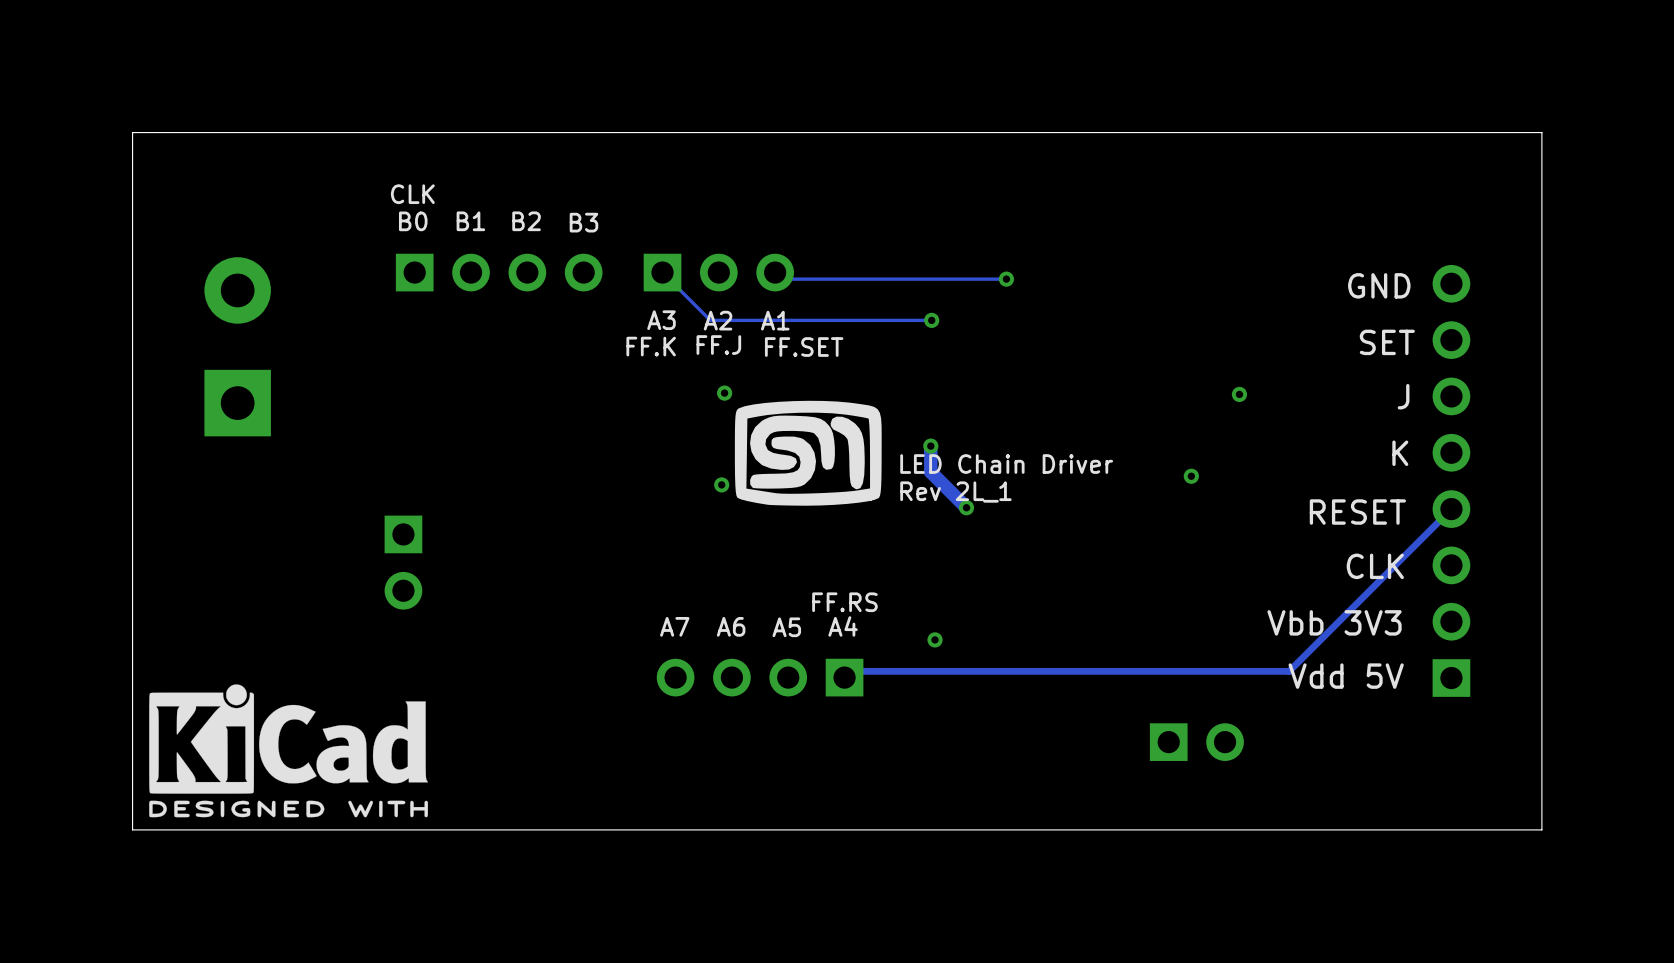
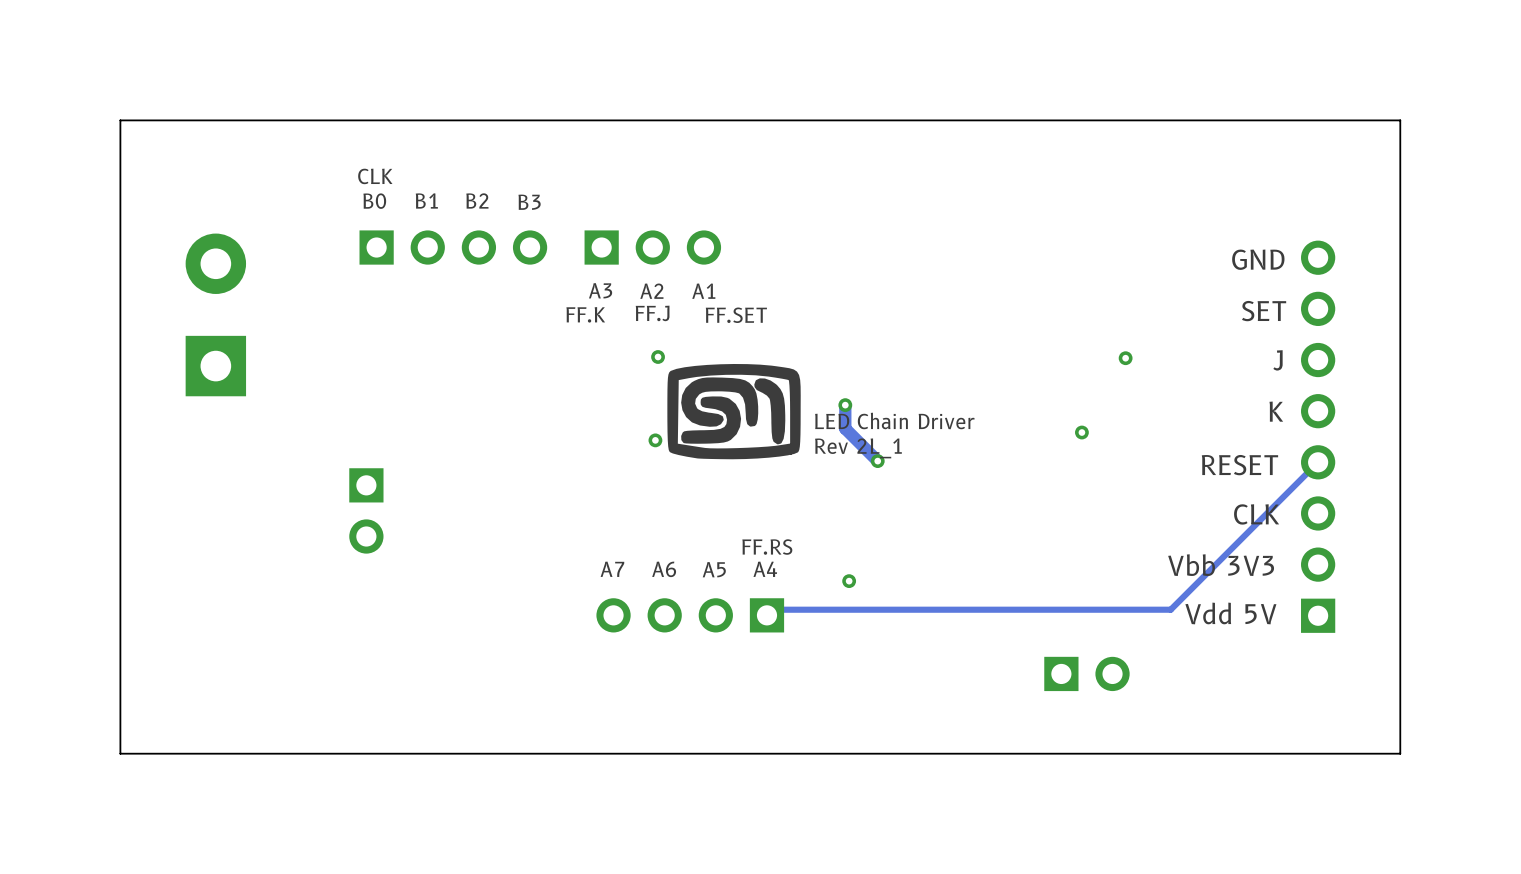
track: (662, 272) (710, 320) (931, 320) -> none
track: (775, 272) (781, 279) (1006, 279) -> none
via: (1006, 279) -> none
via: (931, 320) -> none
drawing: [149, 684, 428, 818] -> none

